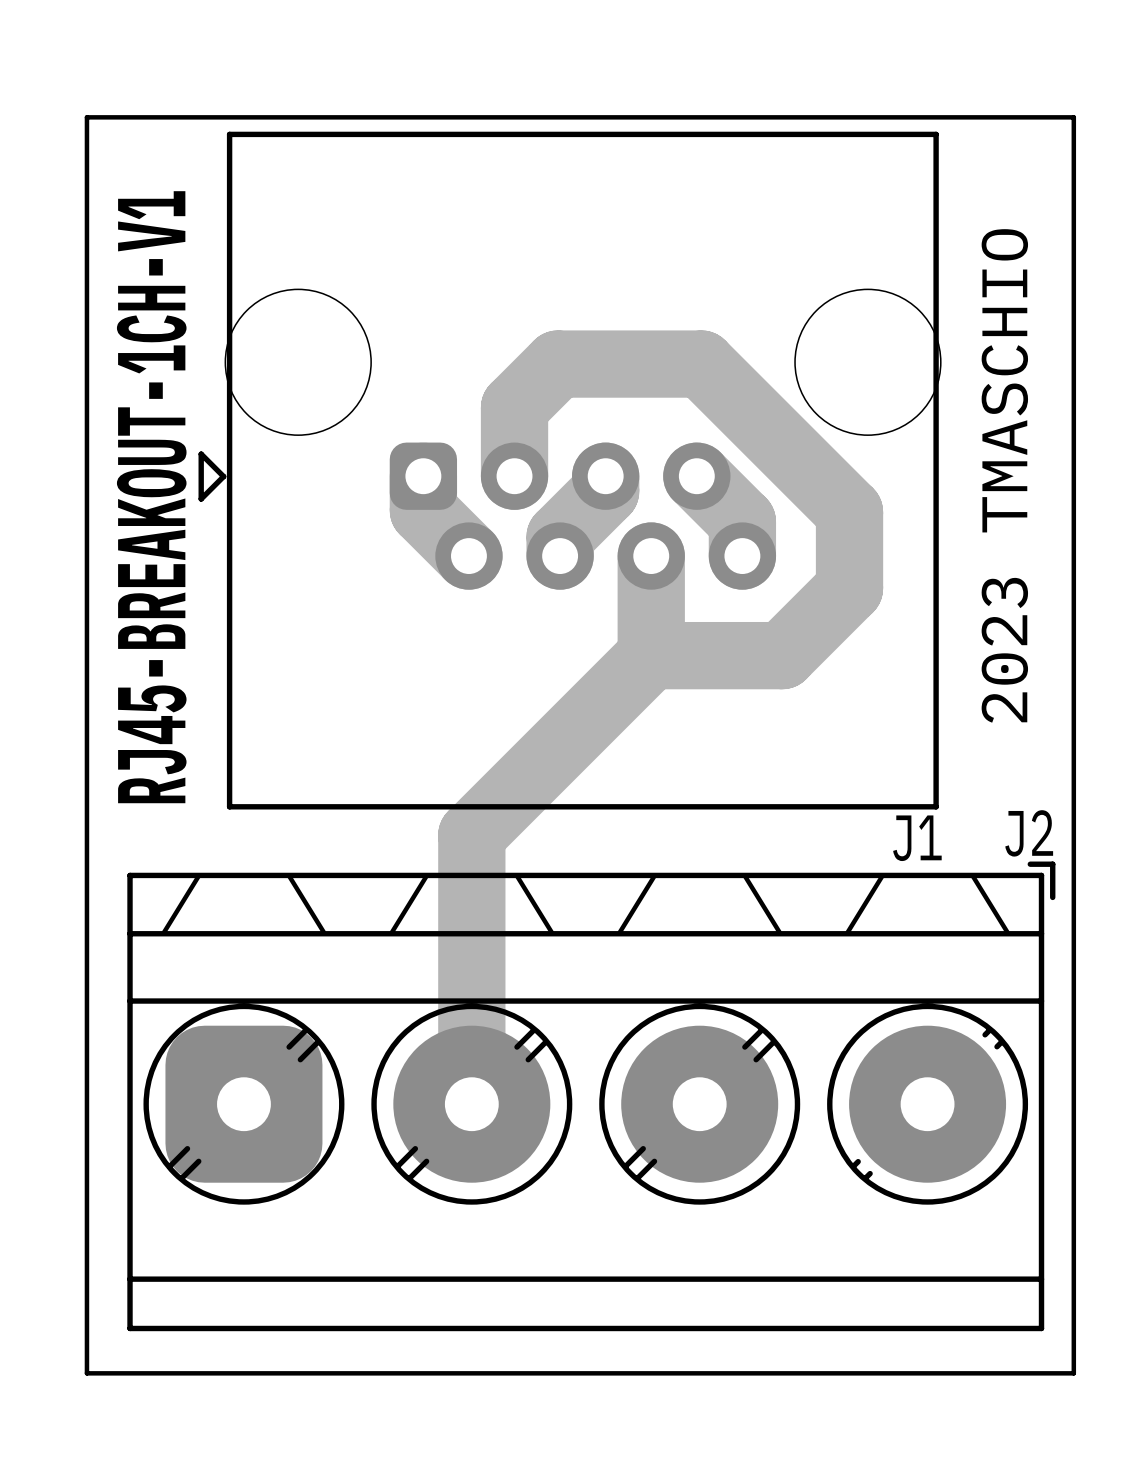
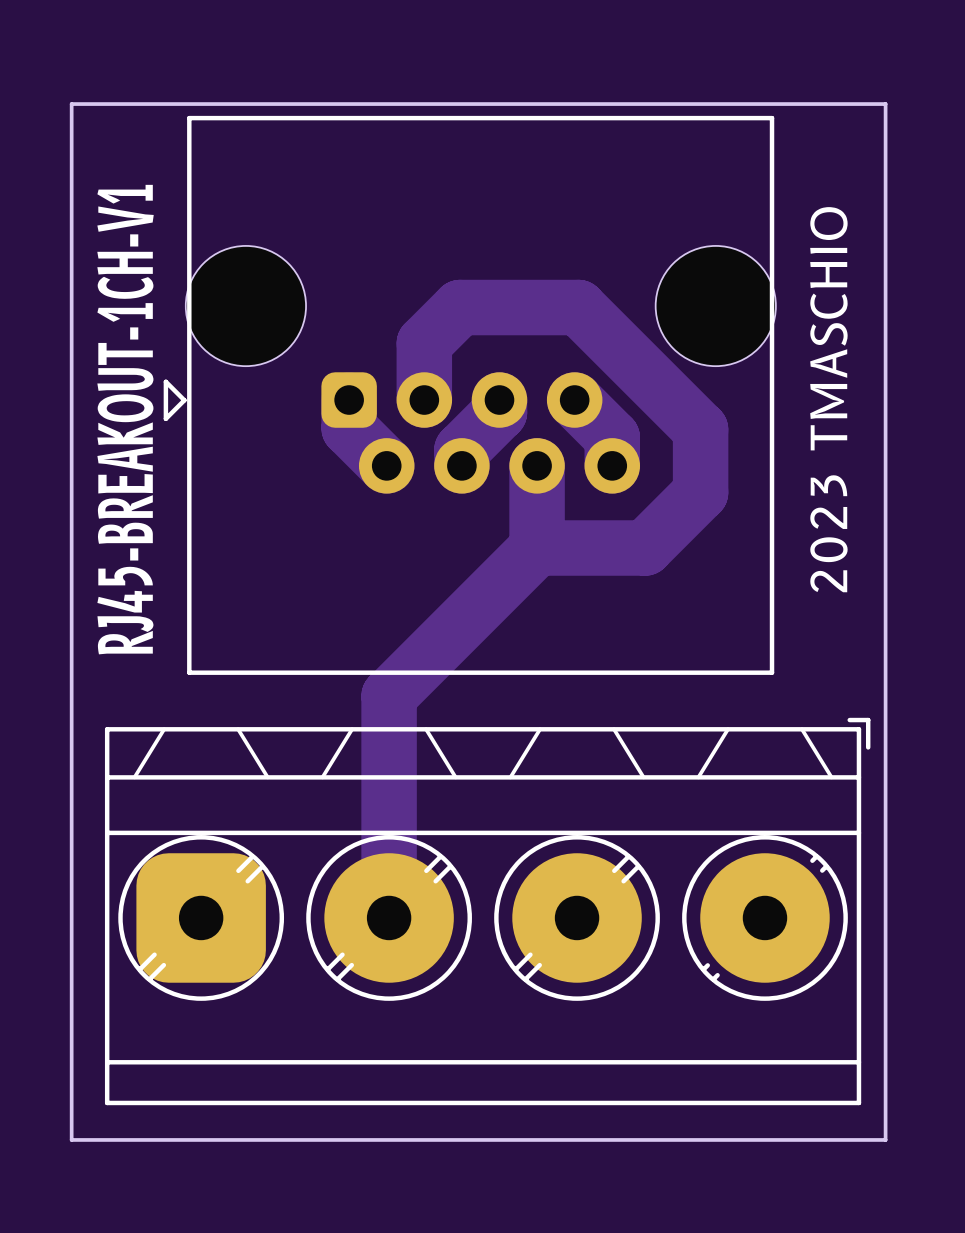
J2 name: J2 (1029, 833) -> none
J1 name: J1 (917, 838) -> none

